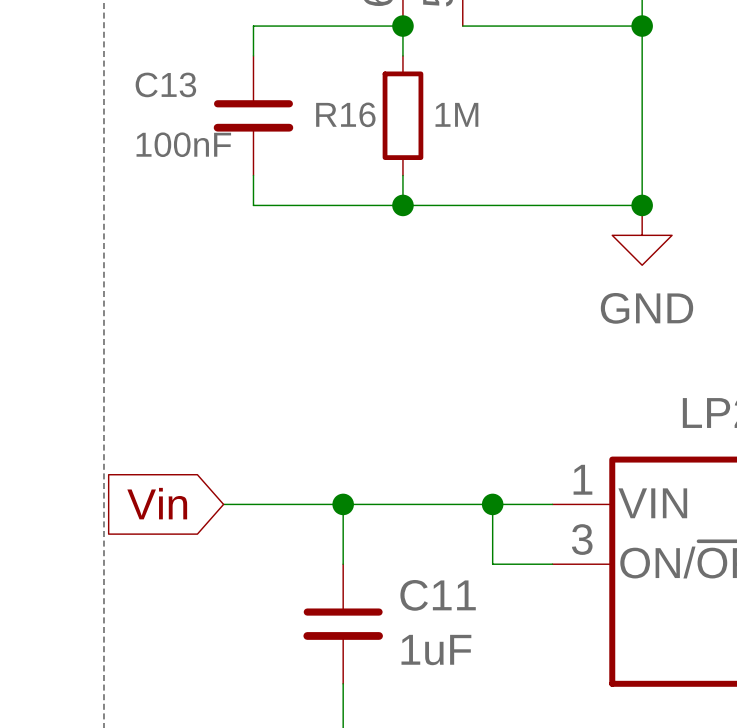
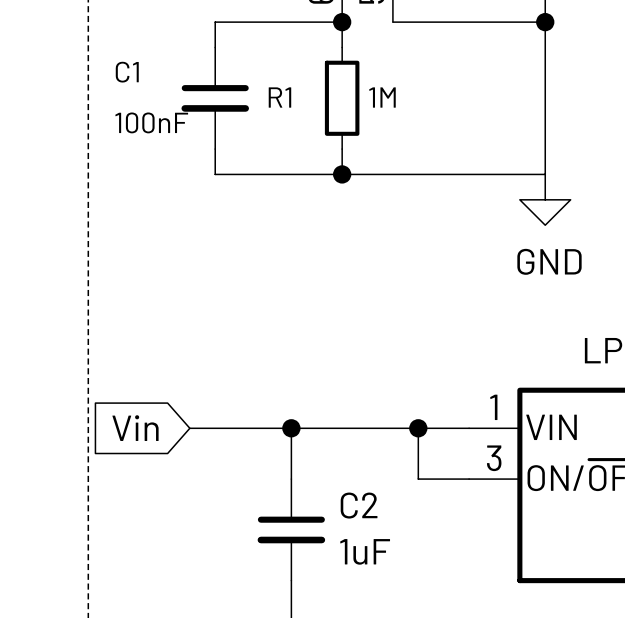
C13 name: C13 (165, 84) -> C1 (127, 72)
R16 name: R16 (345, 114) -> R1 (279, 97)
junction: (642, 205) -> none
C11 name: C11 (438, 595) -> C2 (359, 505)

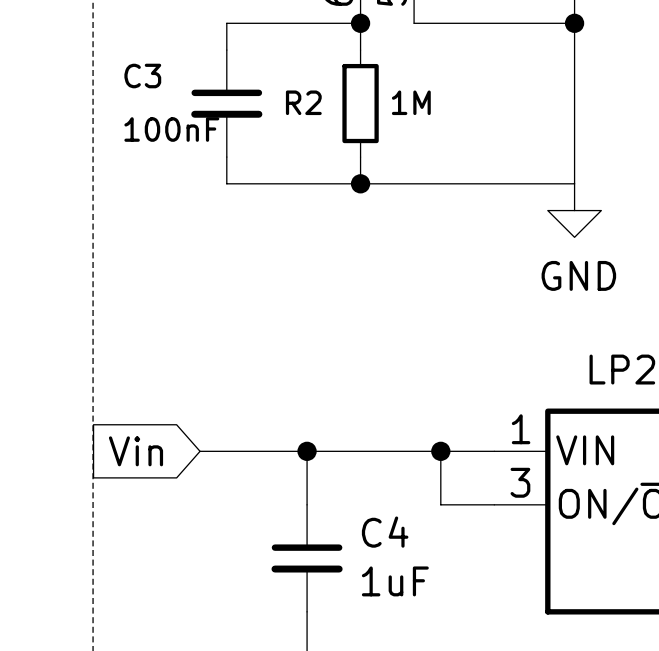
C1 name: C1 (127, 72) -> C3 (142, 76)
R1 name: R1 (279, 97) -> R2 (303, 102)
C2 name: C2 (359, 505) -> C4 (385, 532)

